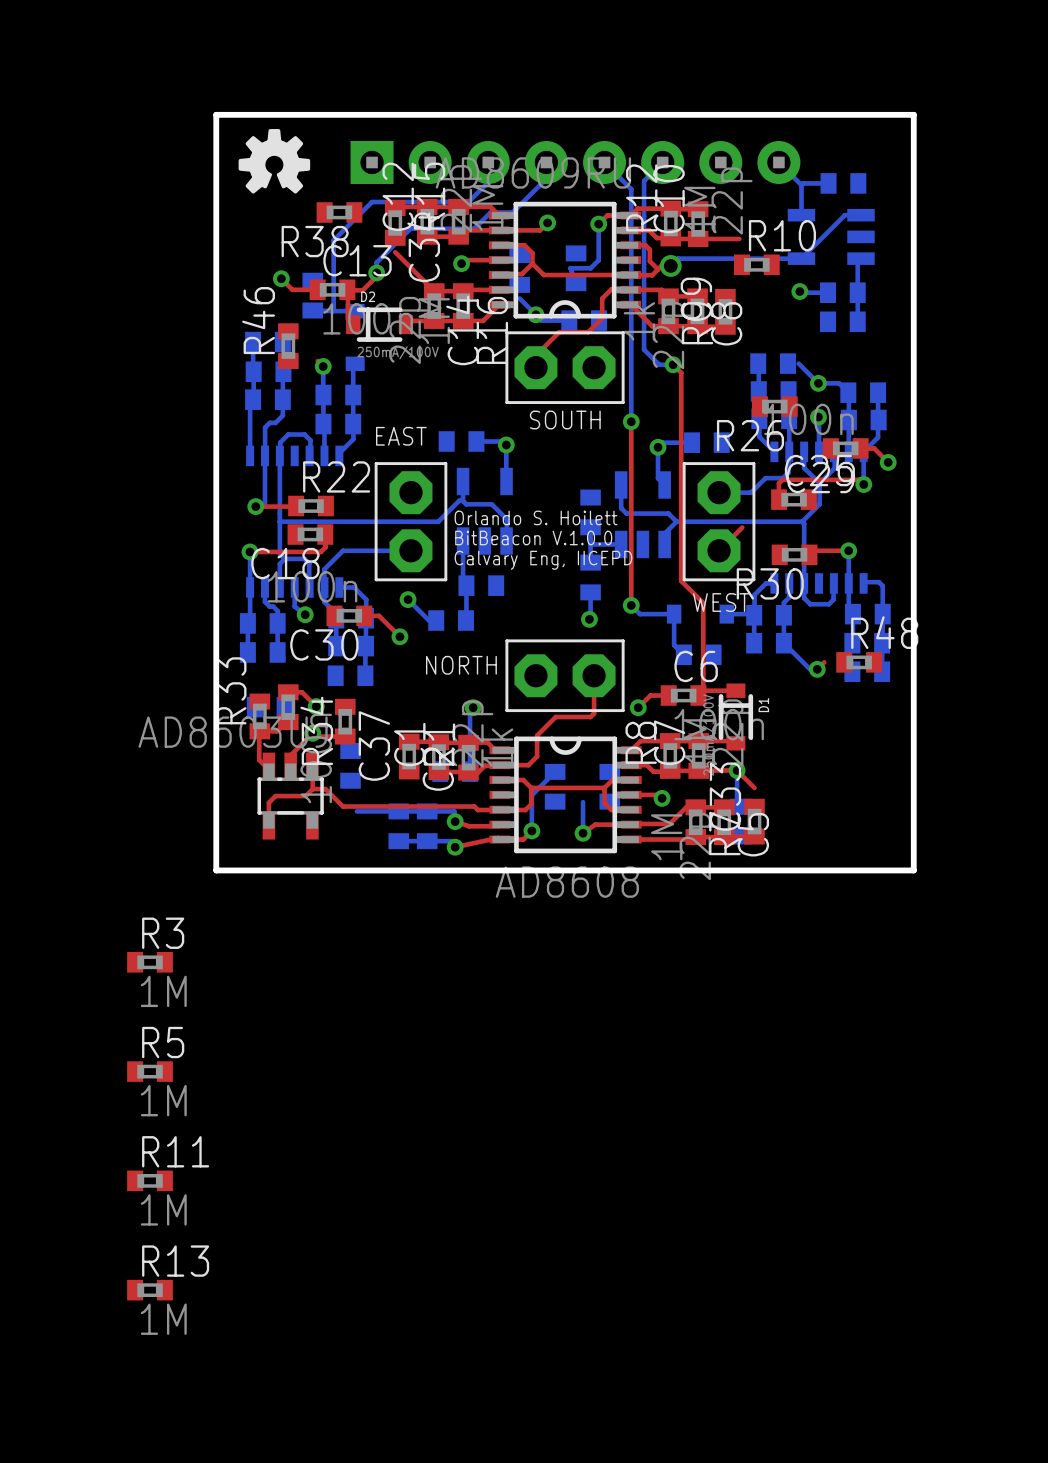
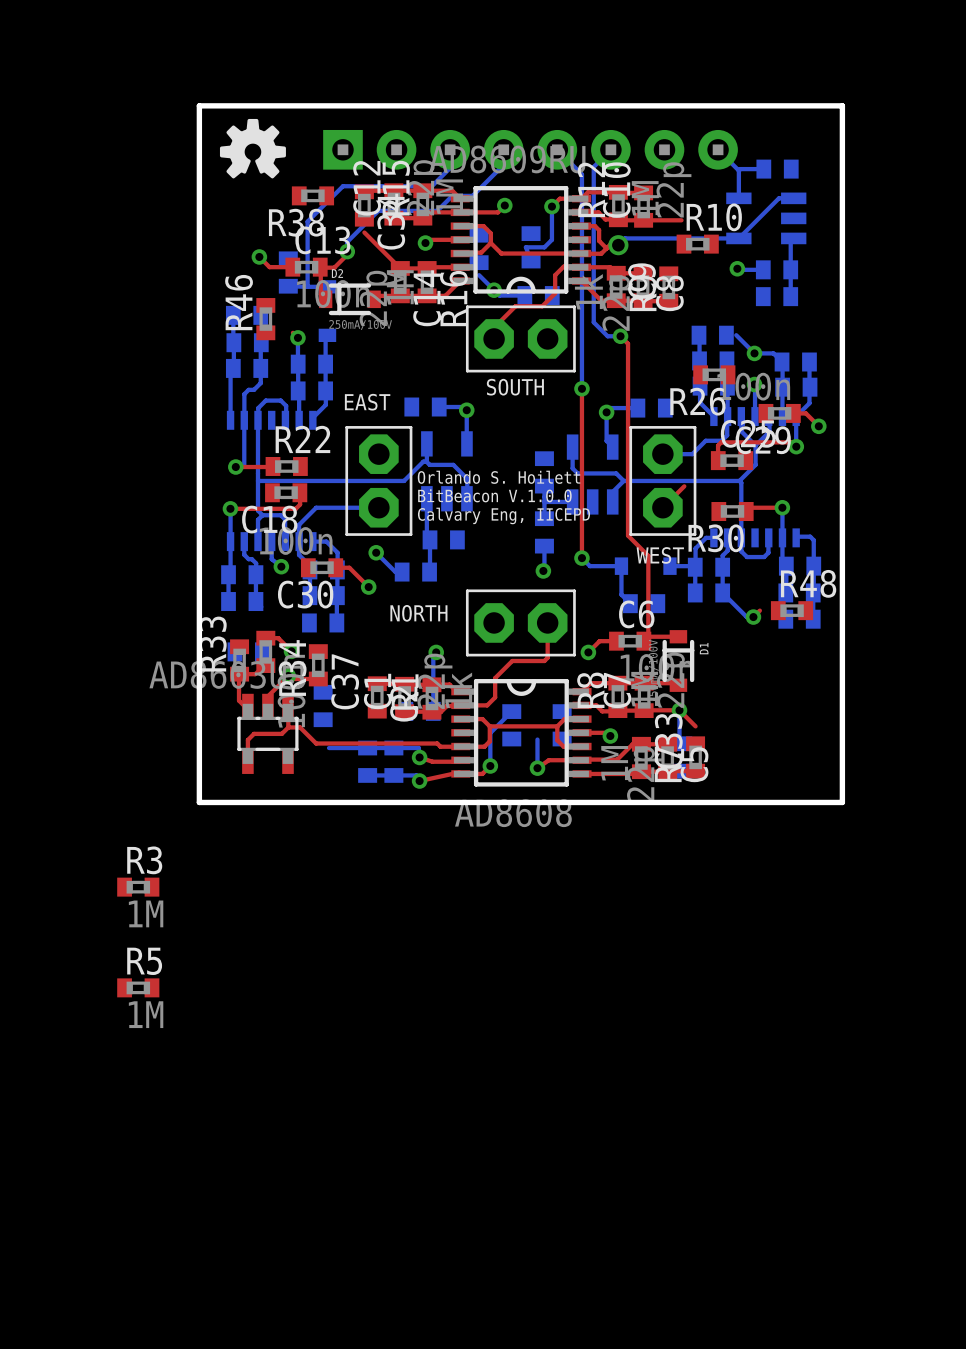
R11: 1M (150, 1180) -> none
R13: 1M (150, 1290) -> none

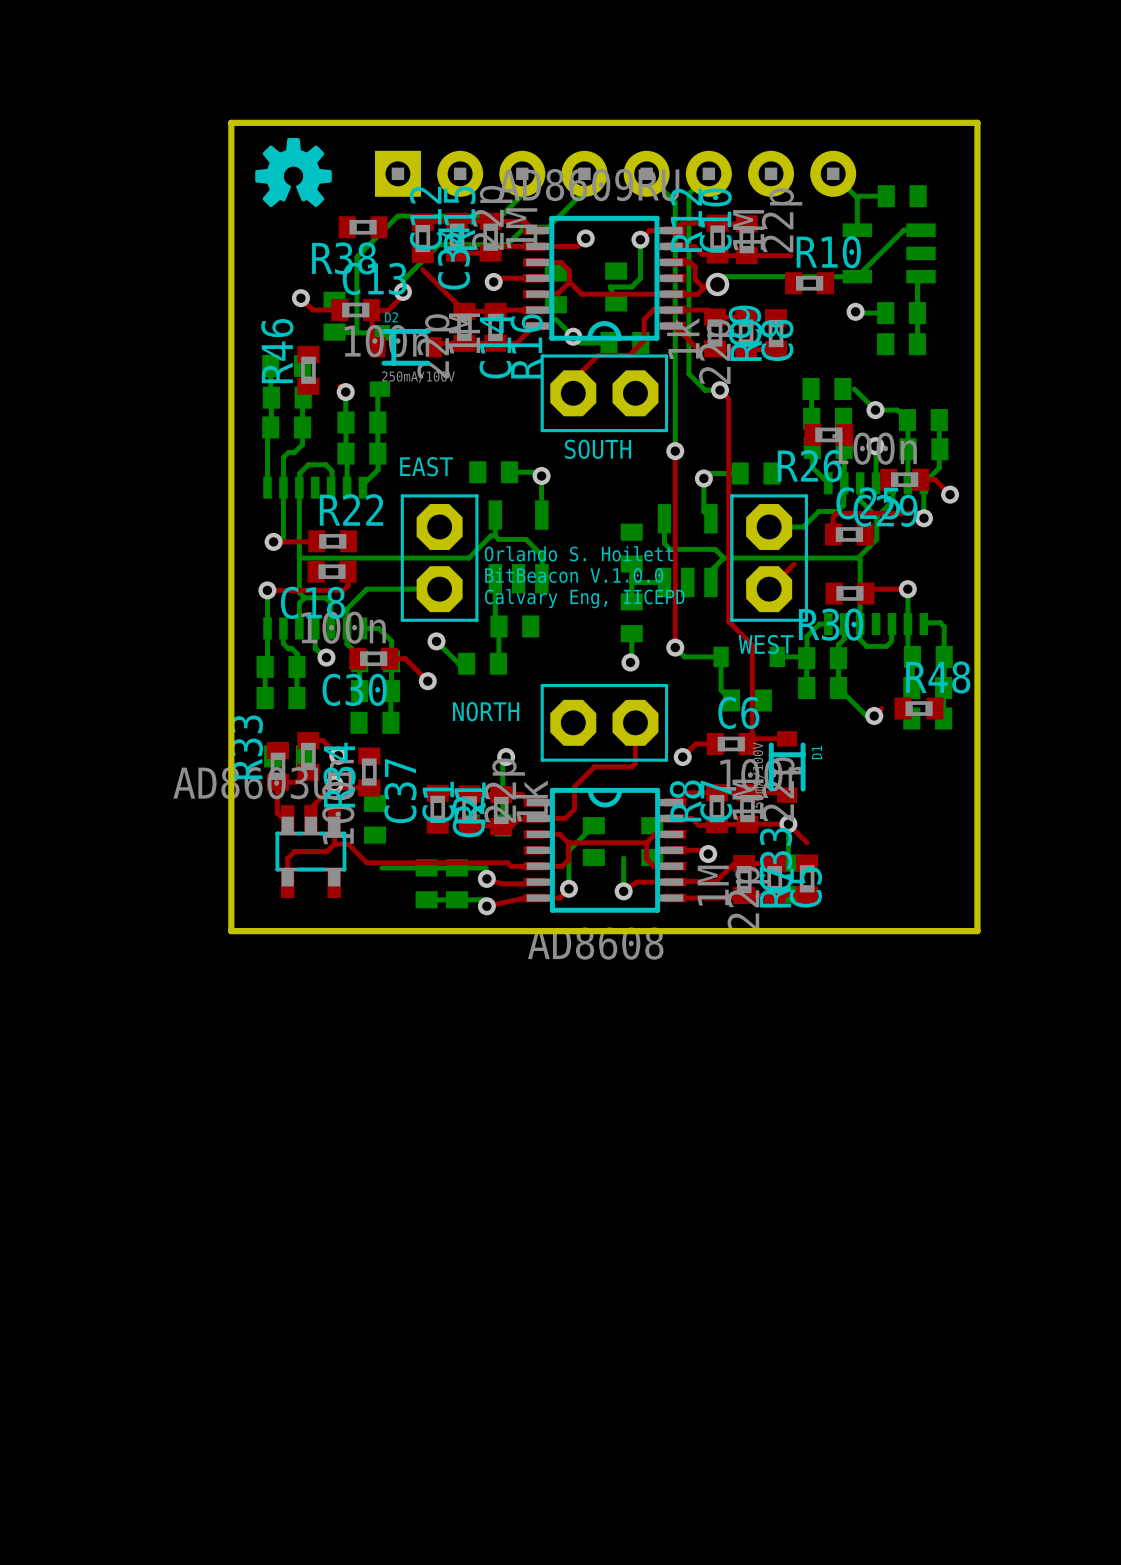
R3: 1M (138, 887) -> none
R5: 1M (138, 987) -> none

